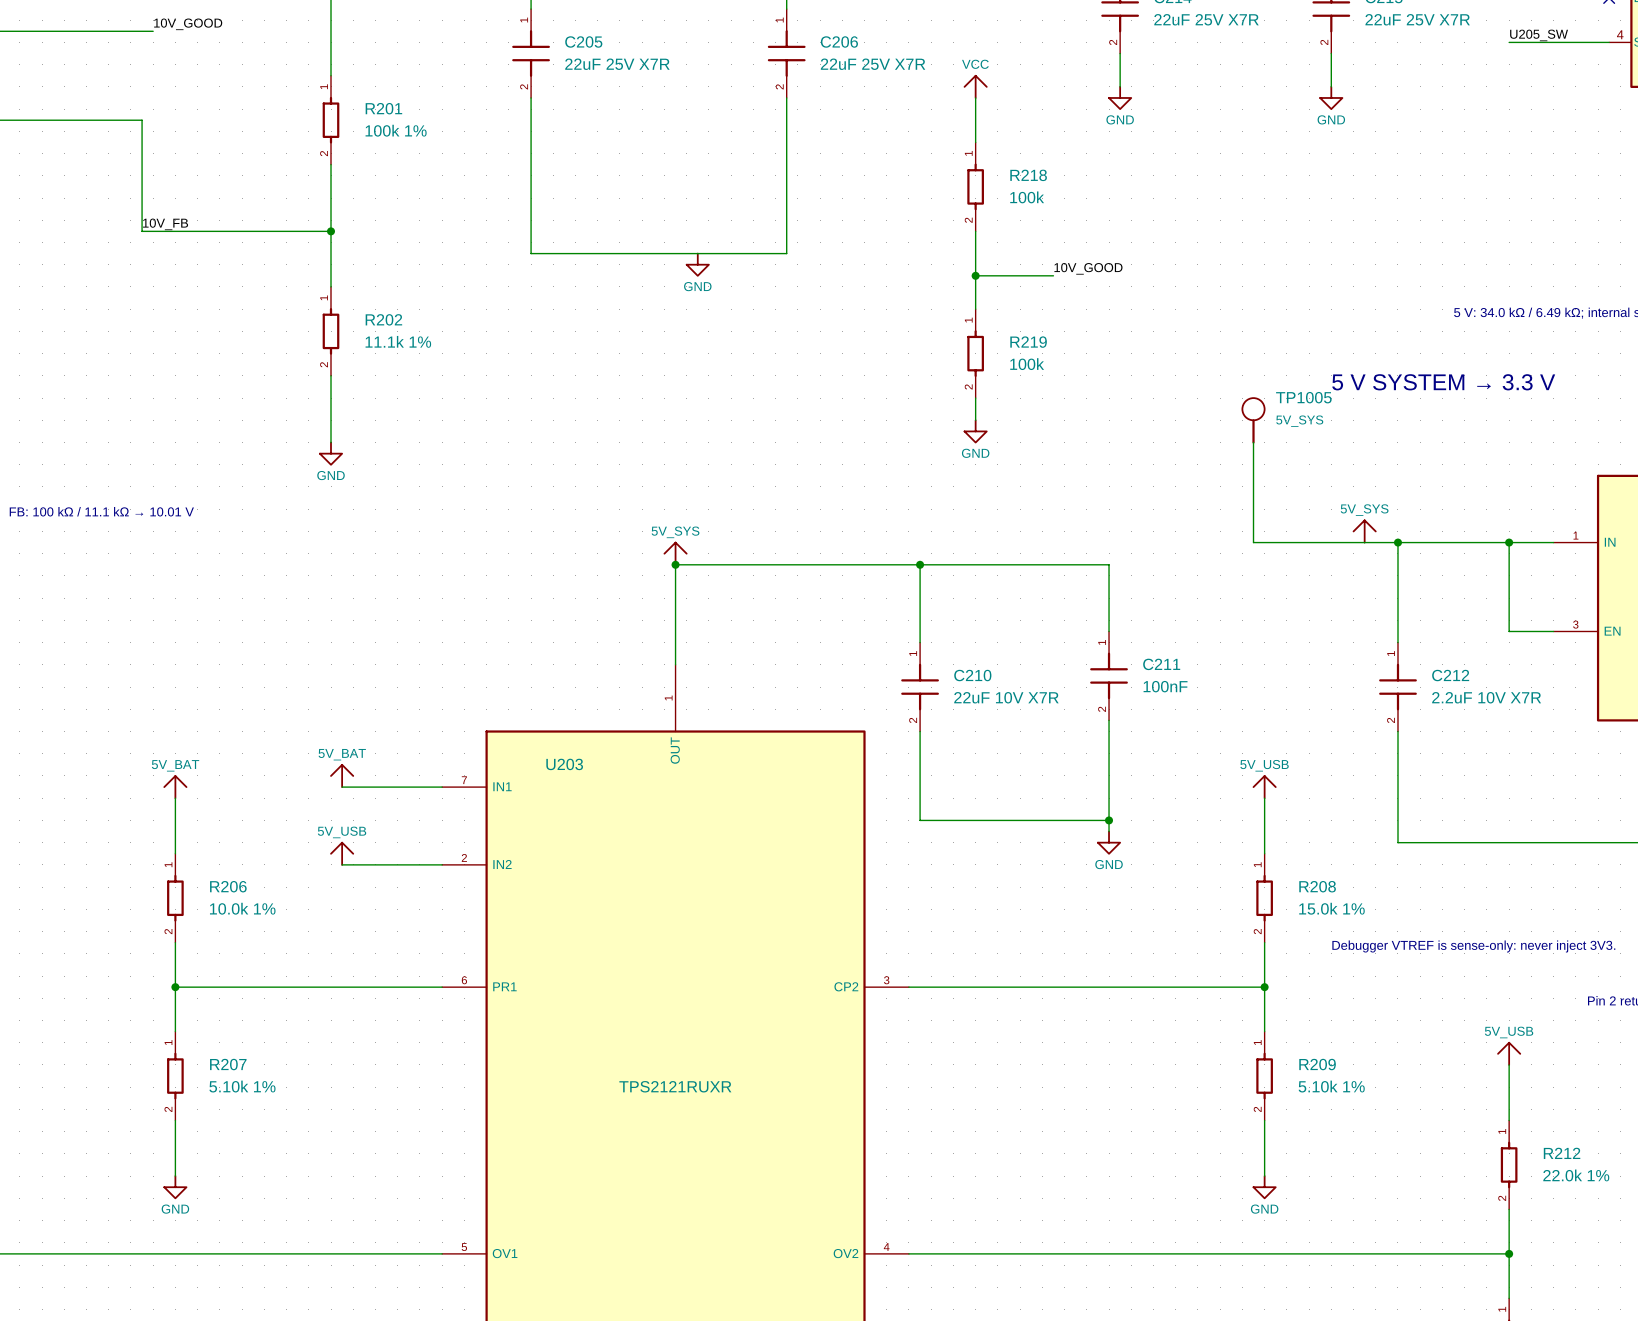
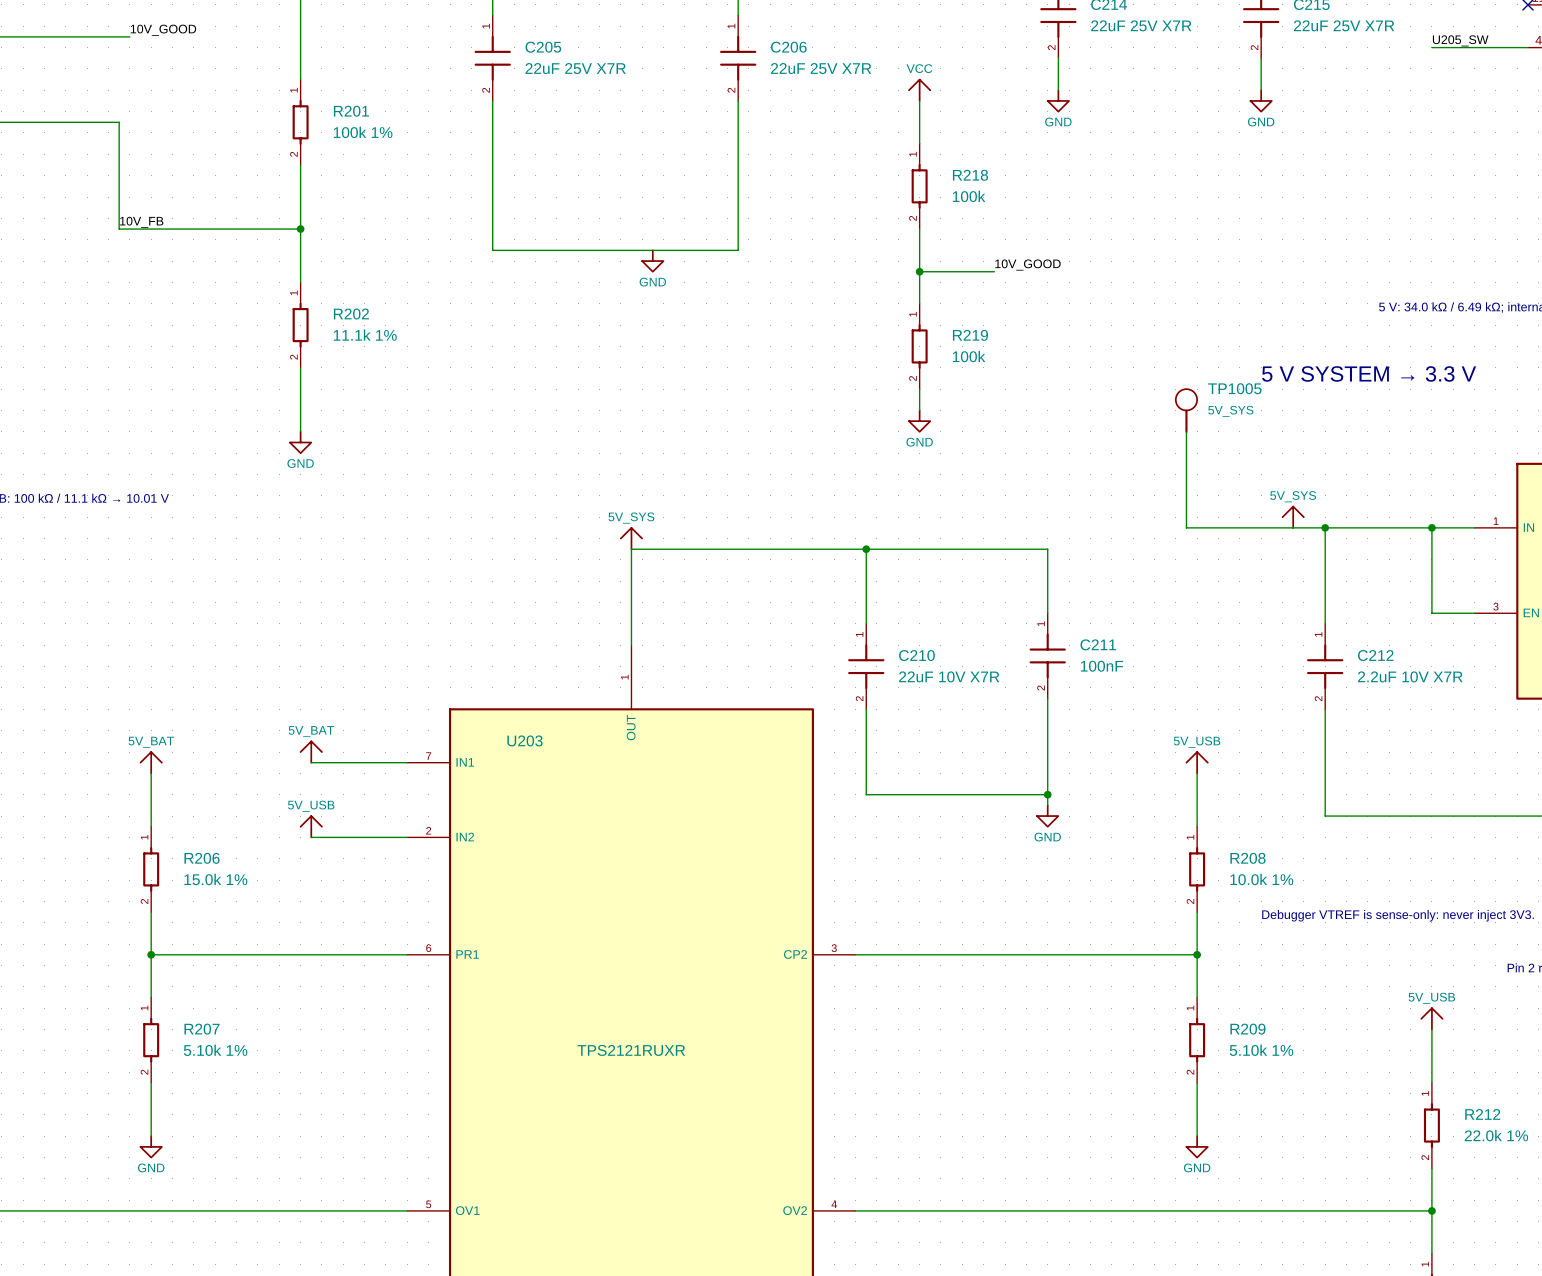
junction: (675, 564) -> none
R206 value: 10.0k 1% (242, 908) -> 15.0k 1% (215, 879)
R208 value: 15.0k 1% (1331, 908) -> 10.0k 1% (1261, 879)

